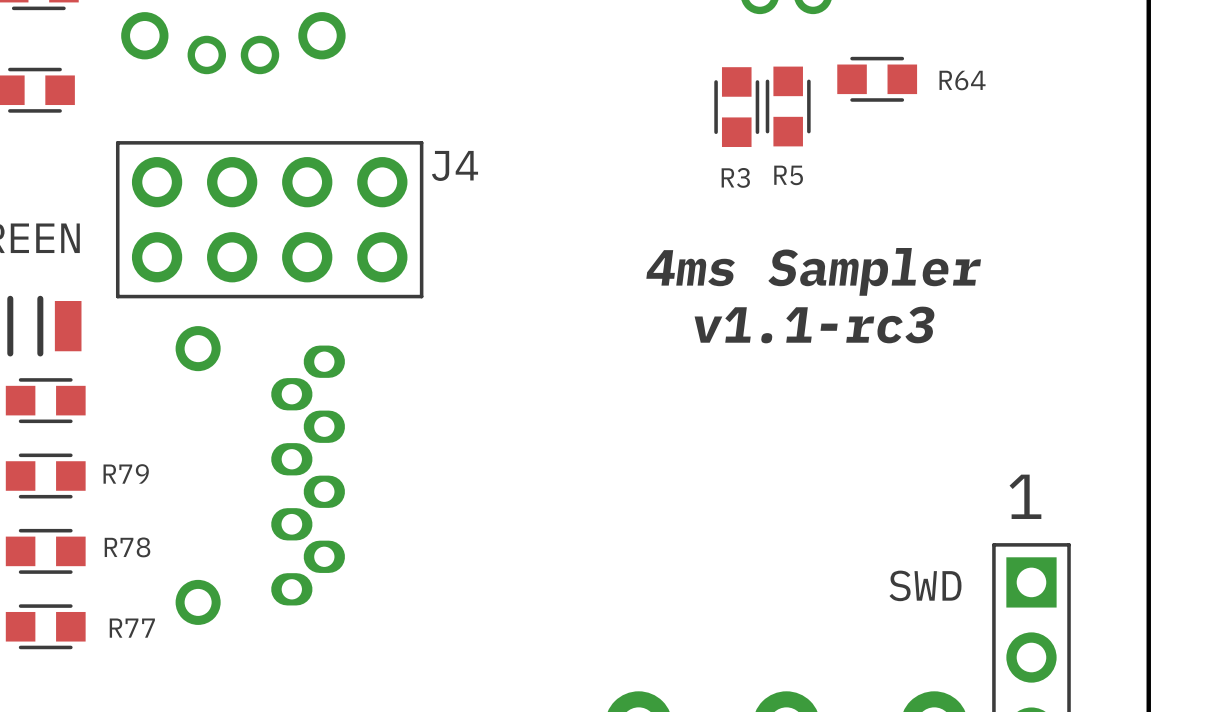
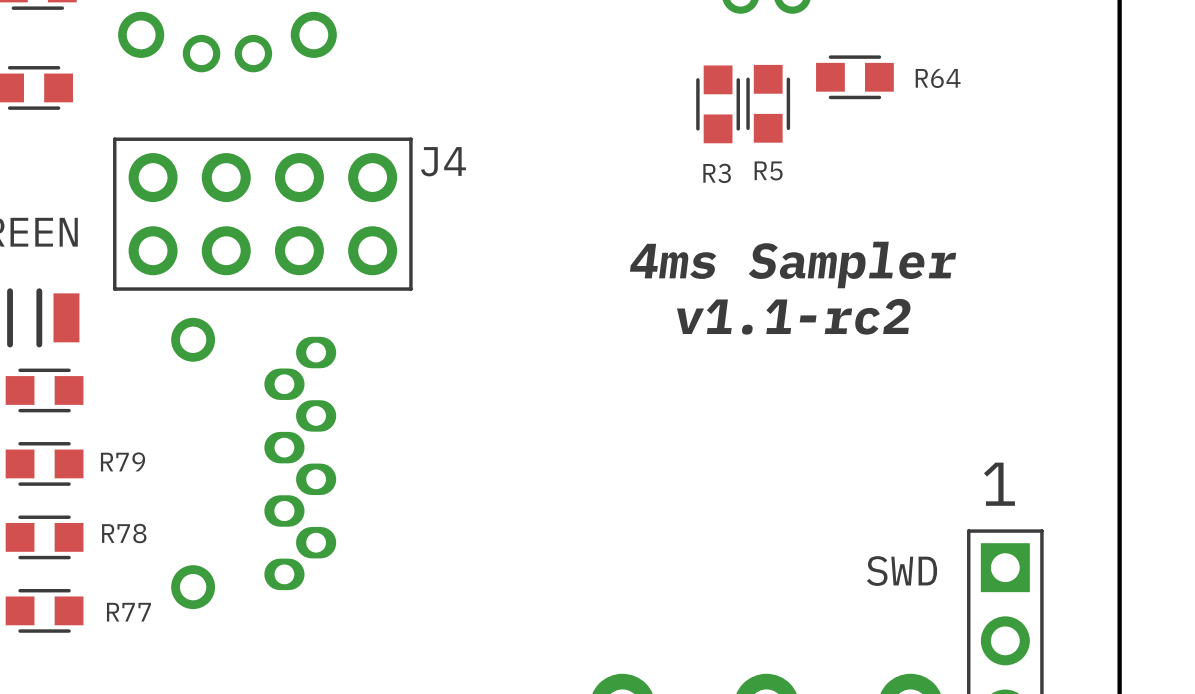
text: v1.1-rc3 (814, 324) -> v1.1-rc2 (793, 316)

